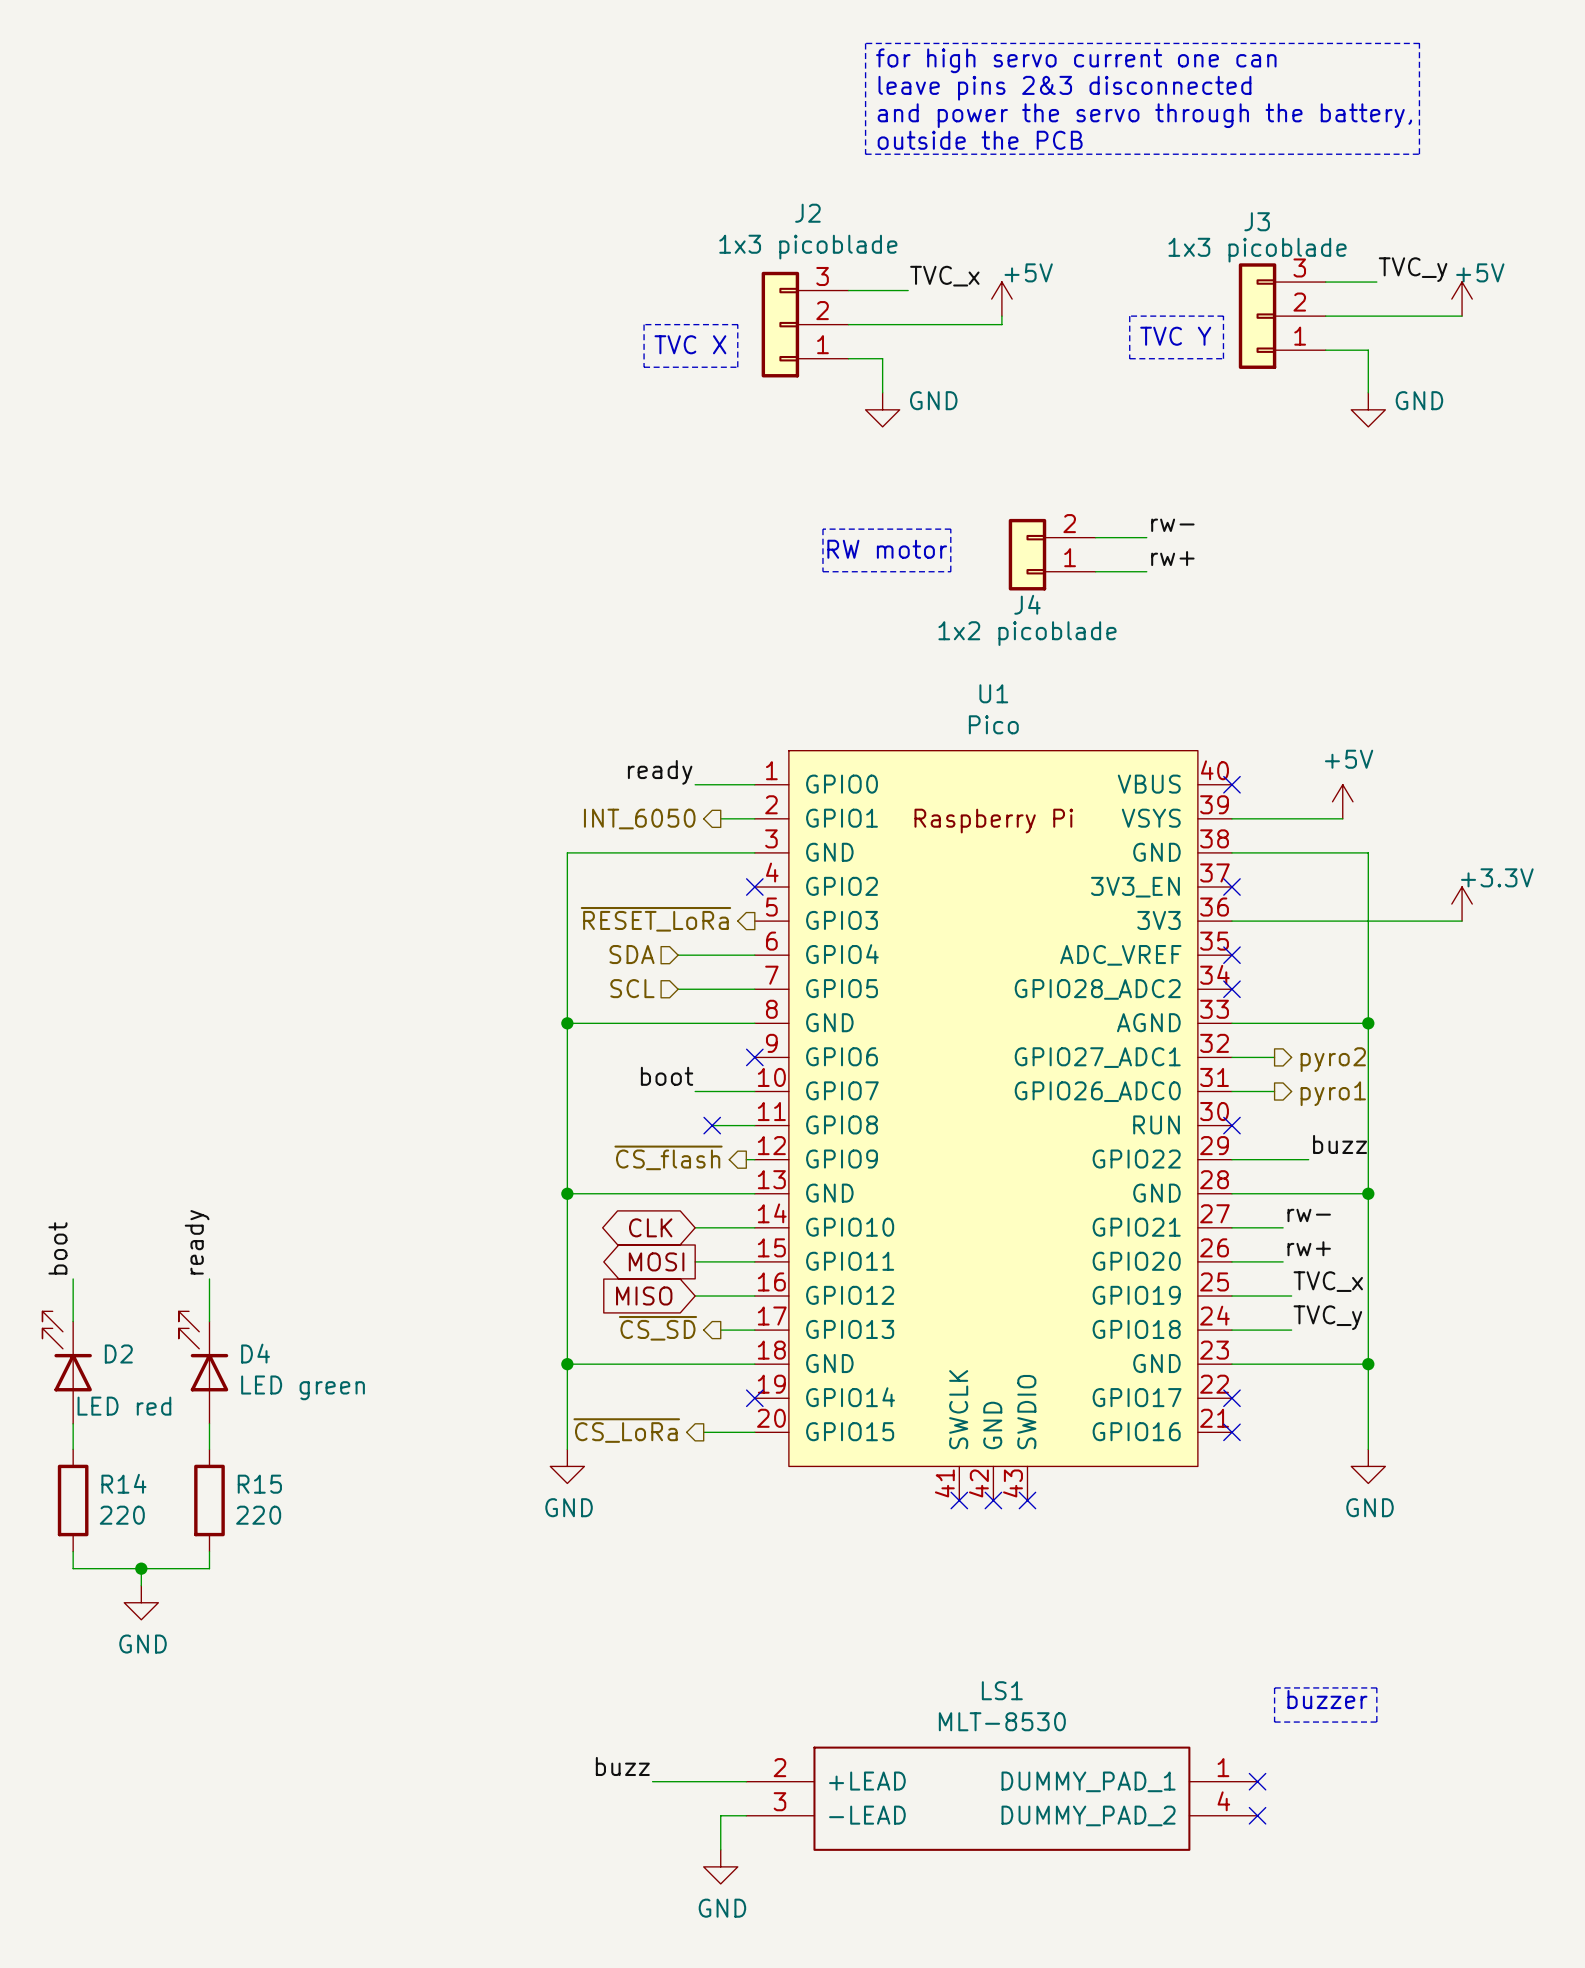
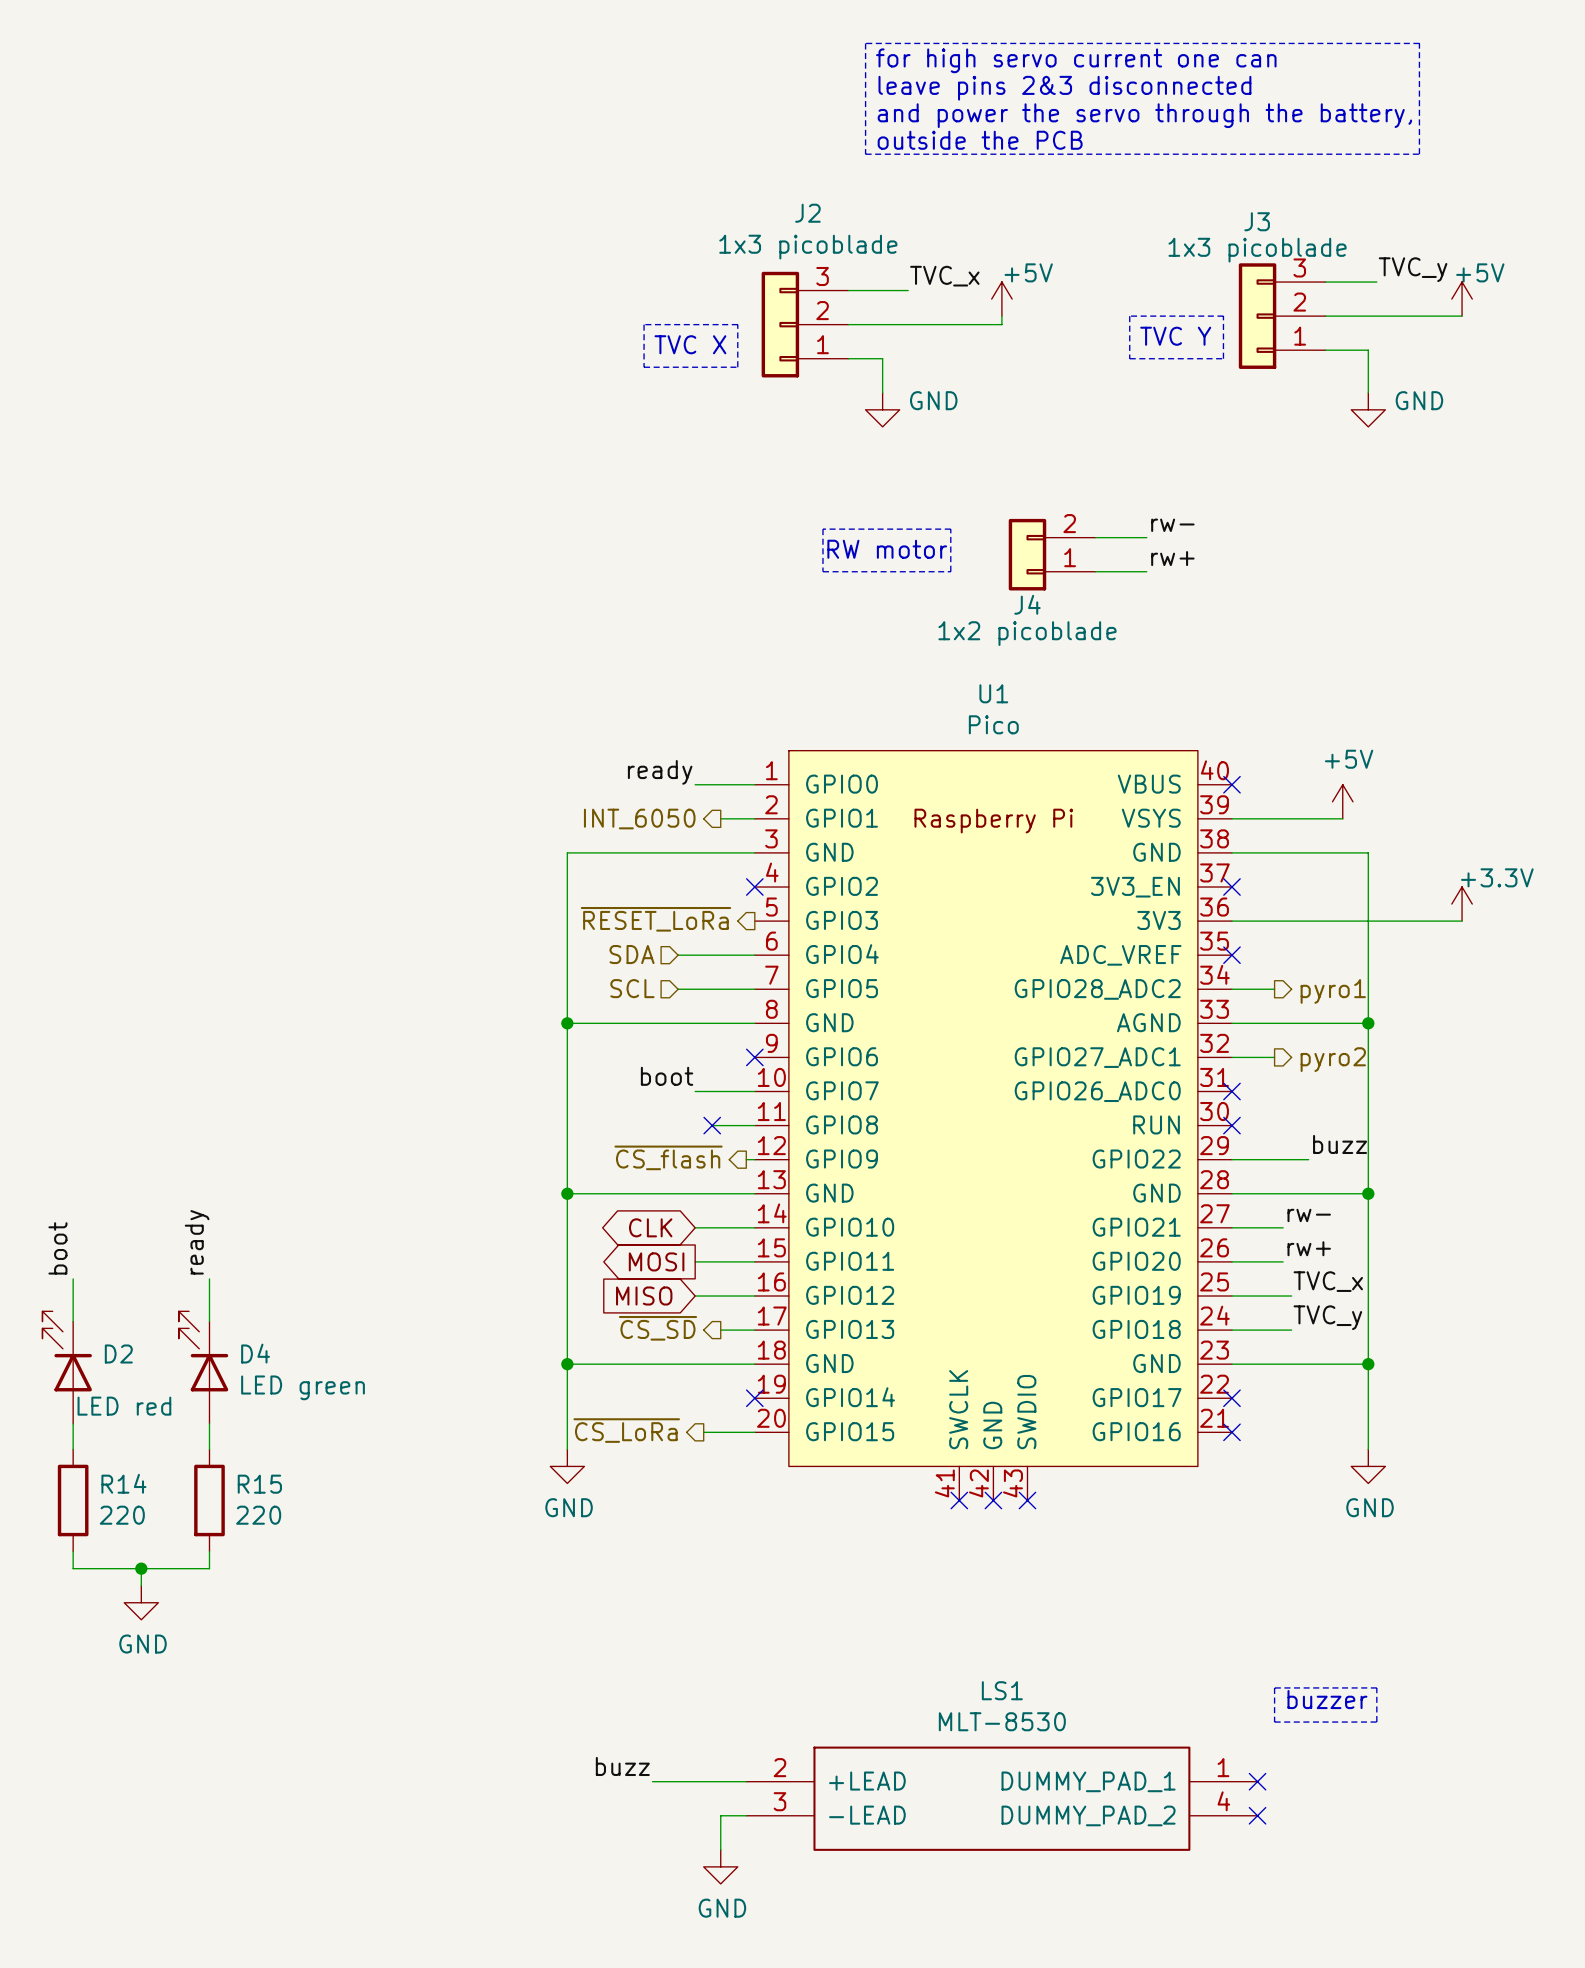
no-connect mark: (1231, 989) -> none
wire: (1231, 1091) (1274, 1091) -> (1231, 989) (1274, 989)
no-connect mark: none -> (1231, 1091)
hierarchical label position: pyro1 (1333, 1093) -> pyro1 (1333, 991)

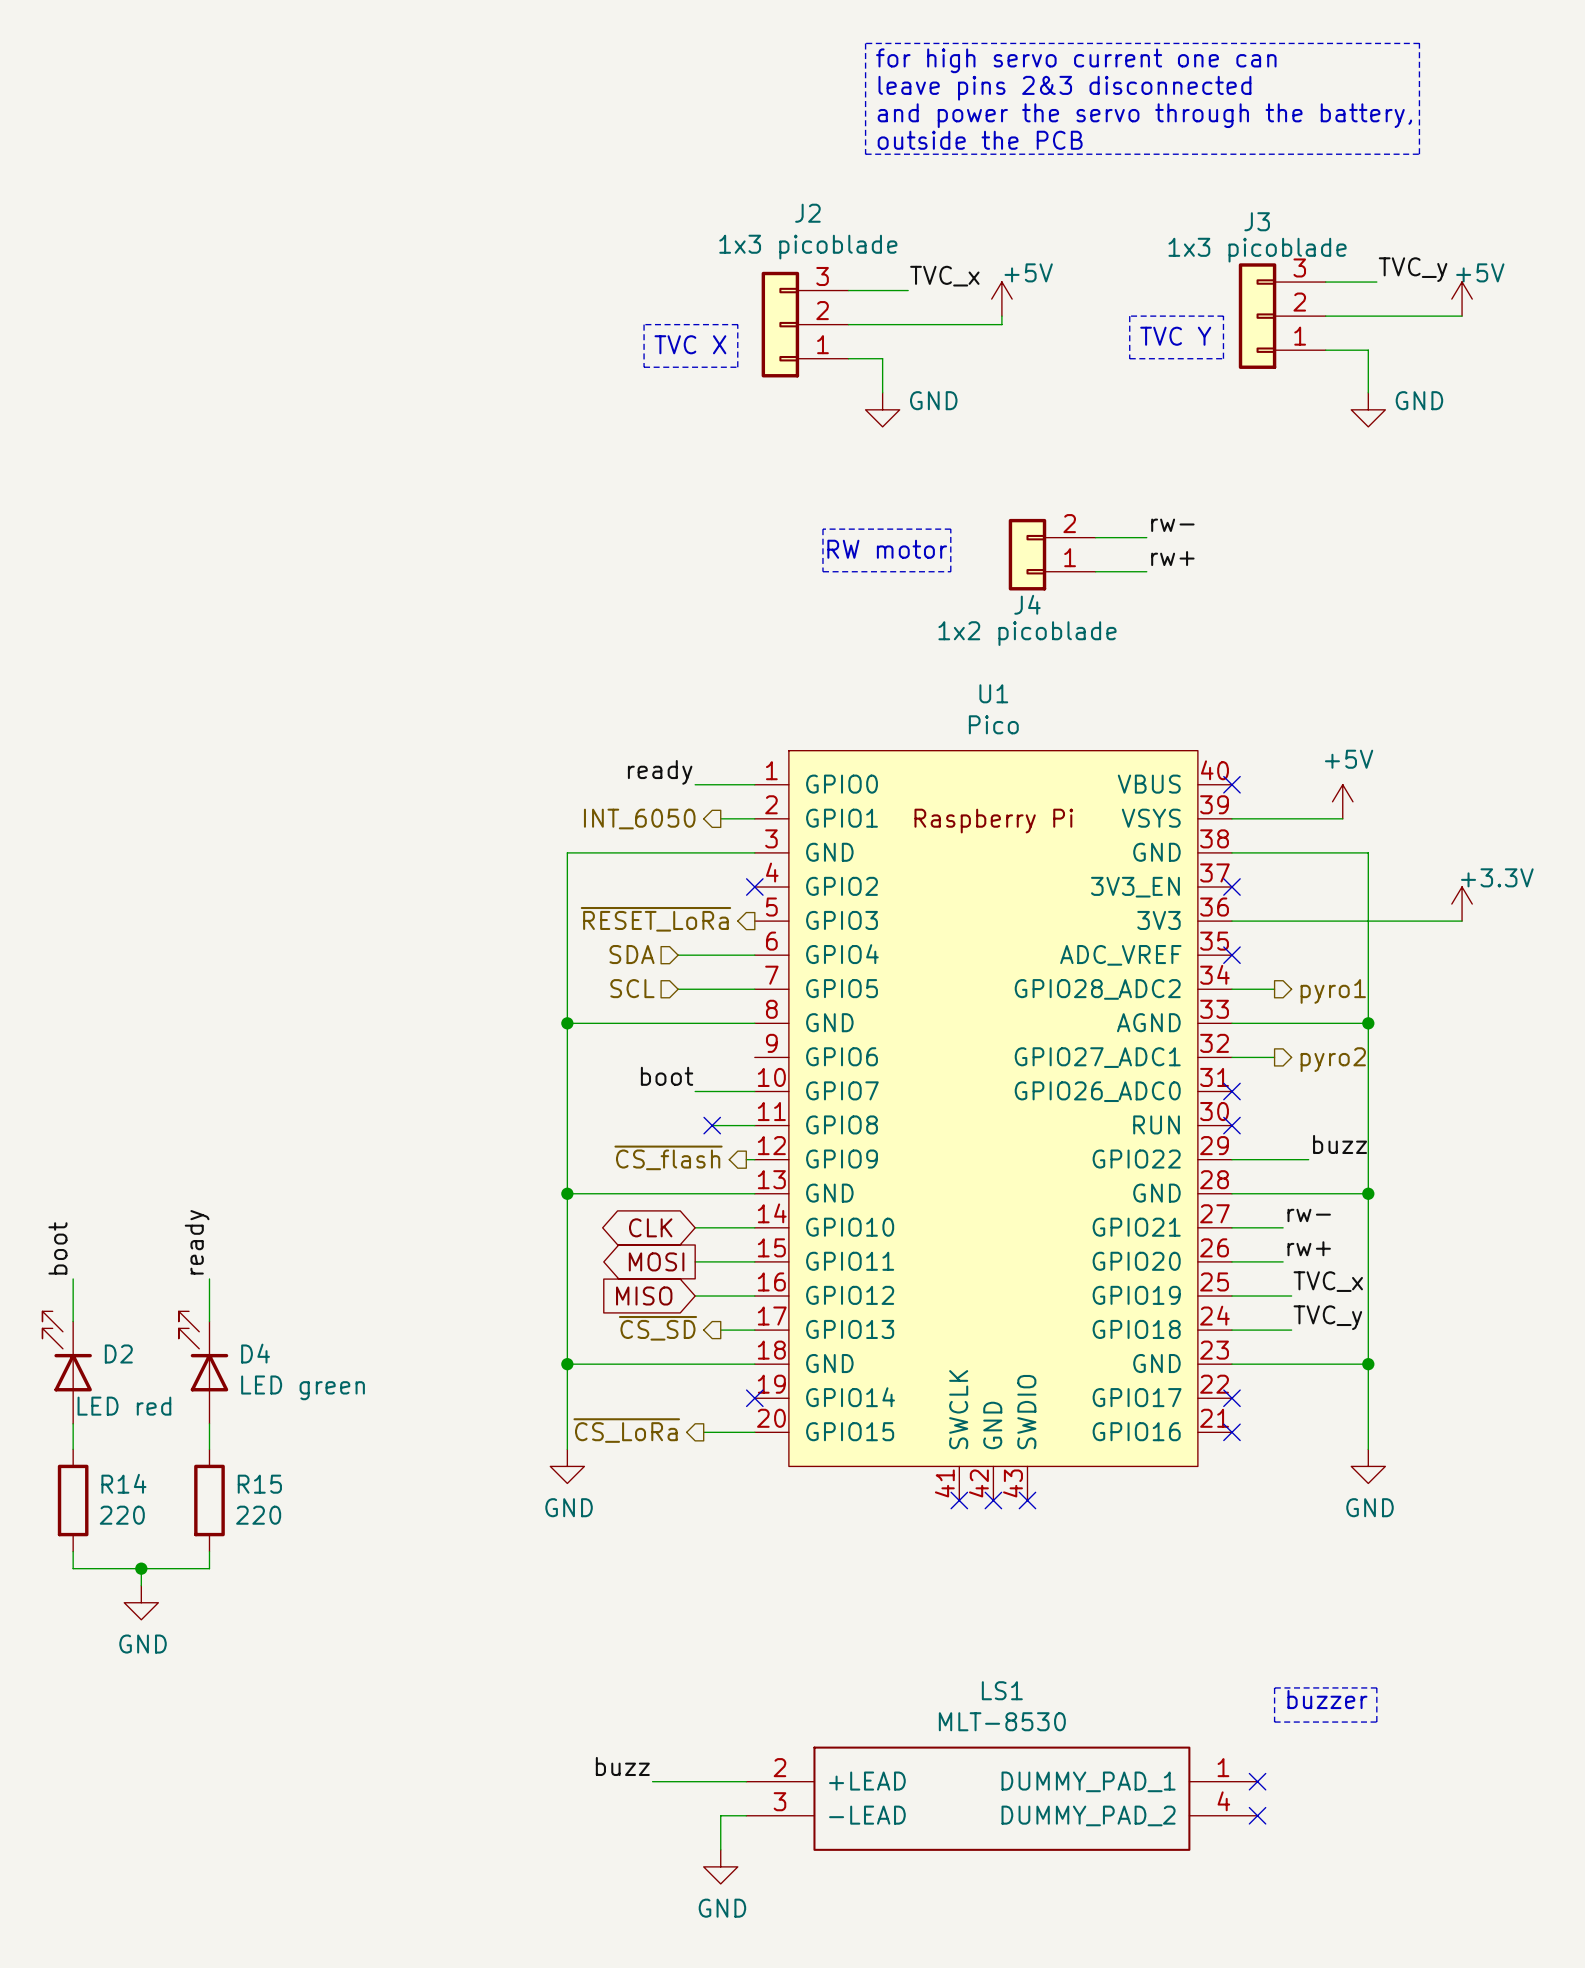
no-connect mark: (754, 1057) -> none

